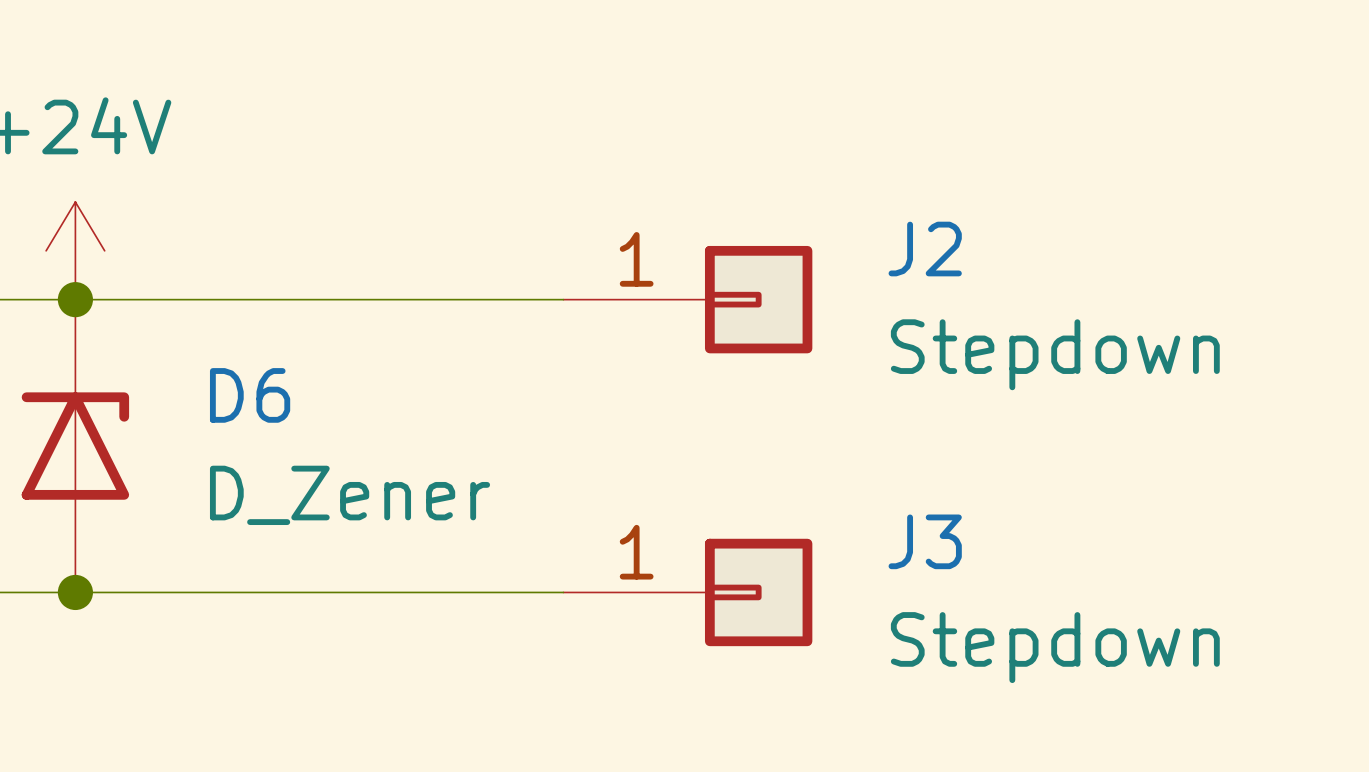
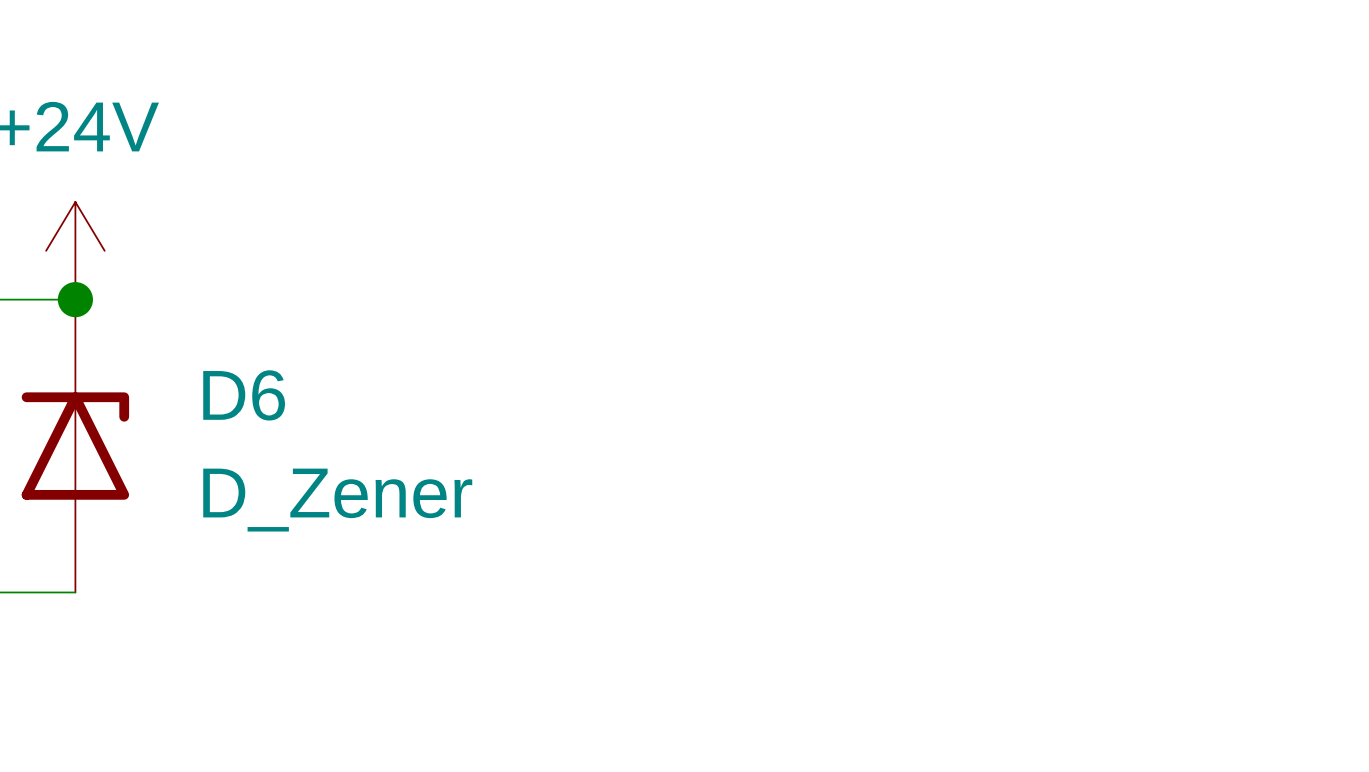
wire: (75, 299) (563, 299) -> none
J2: Stepdown (687, 299) -> none
wire: (75, 592) (563, 592) -> none
junction: (75, 592) -> none
J3: Stepdown (687, 592) -> none

